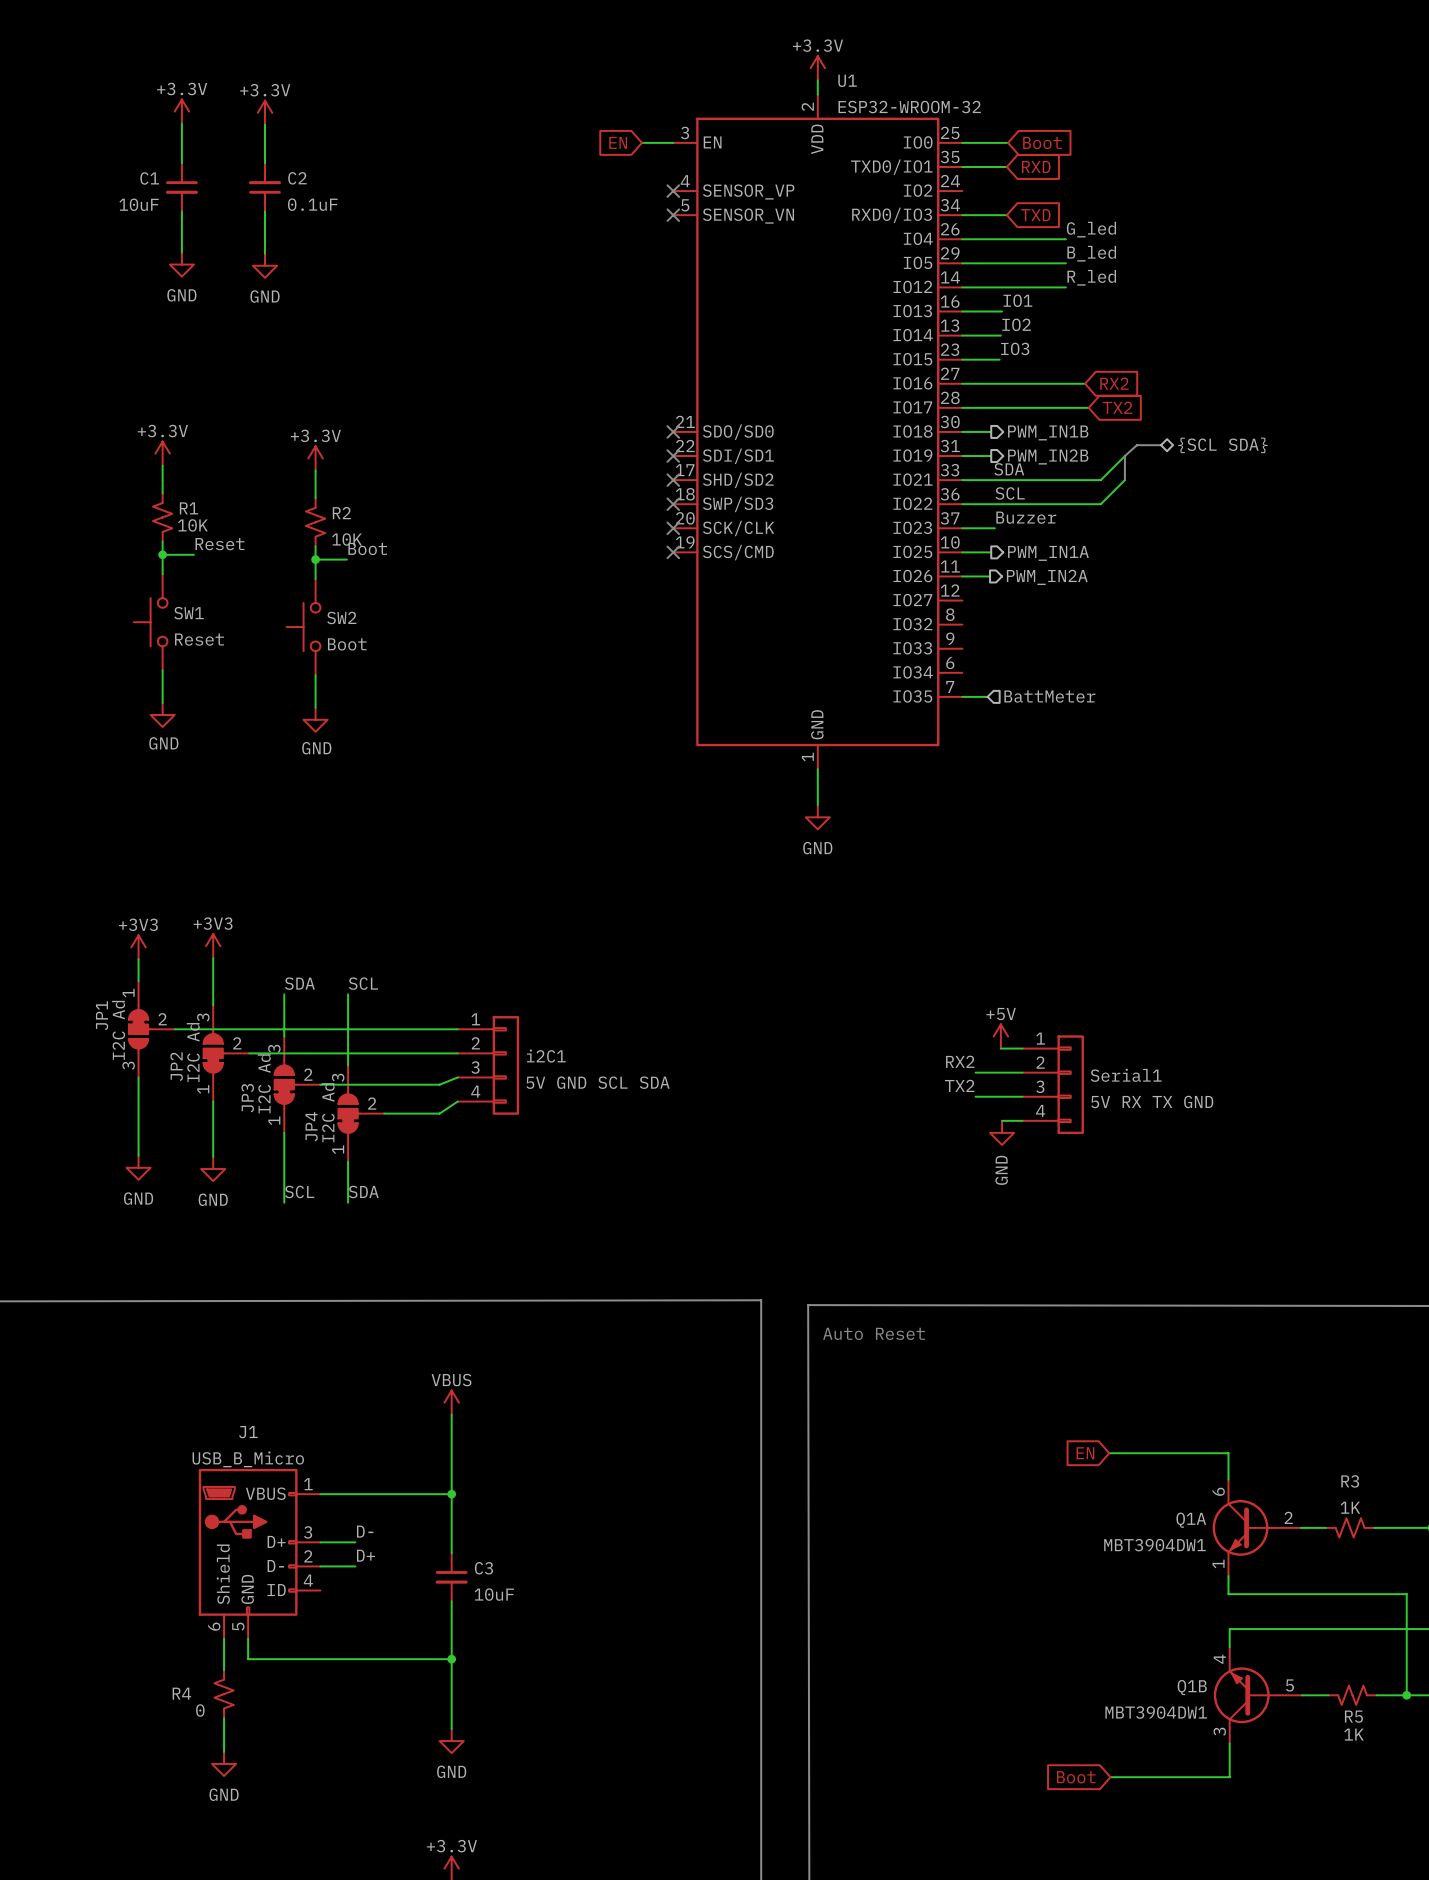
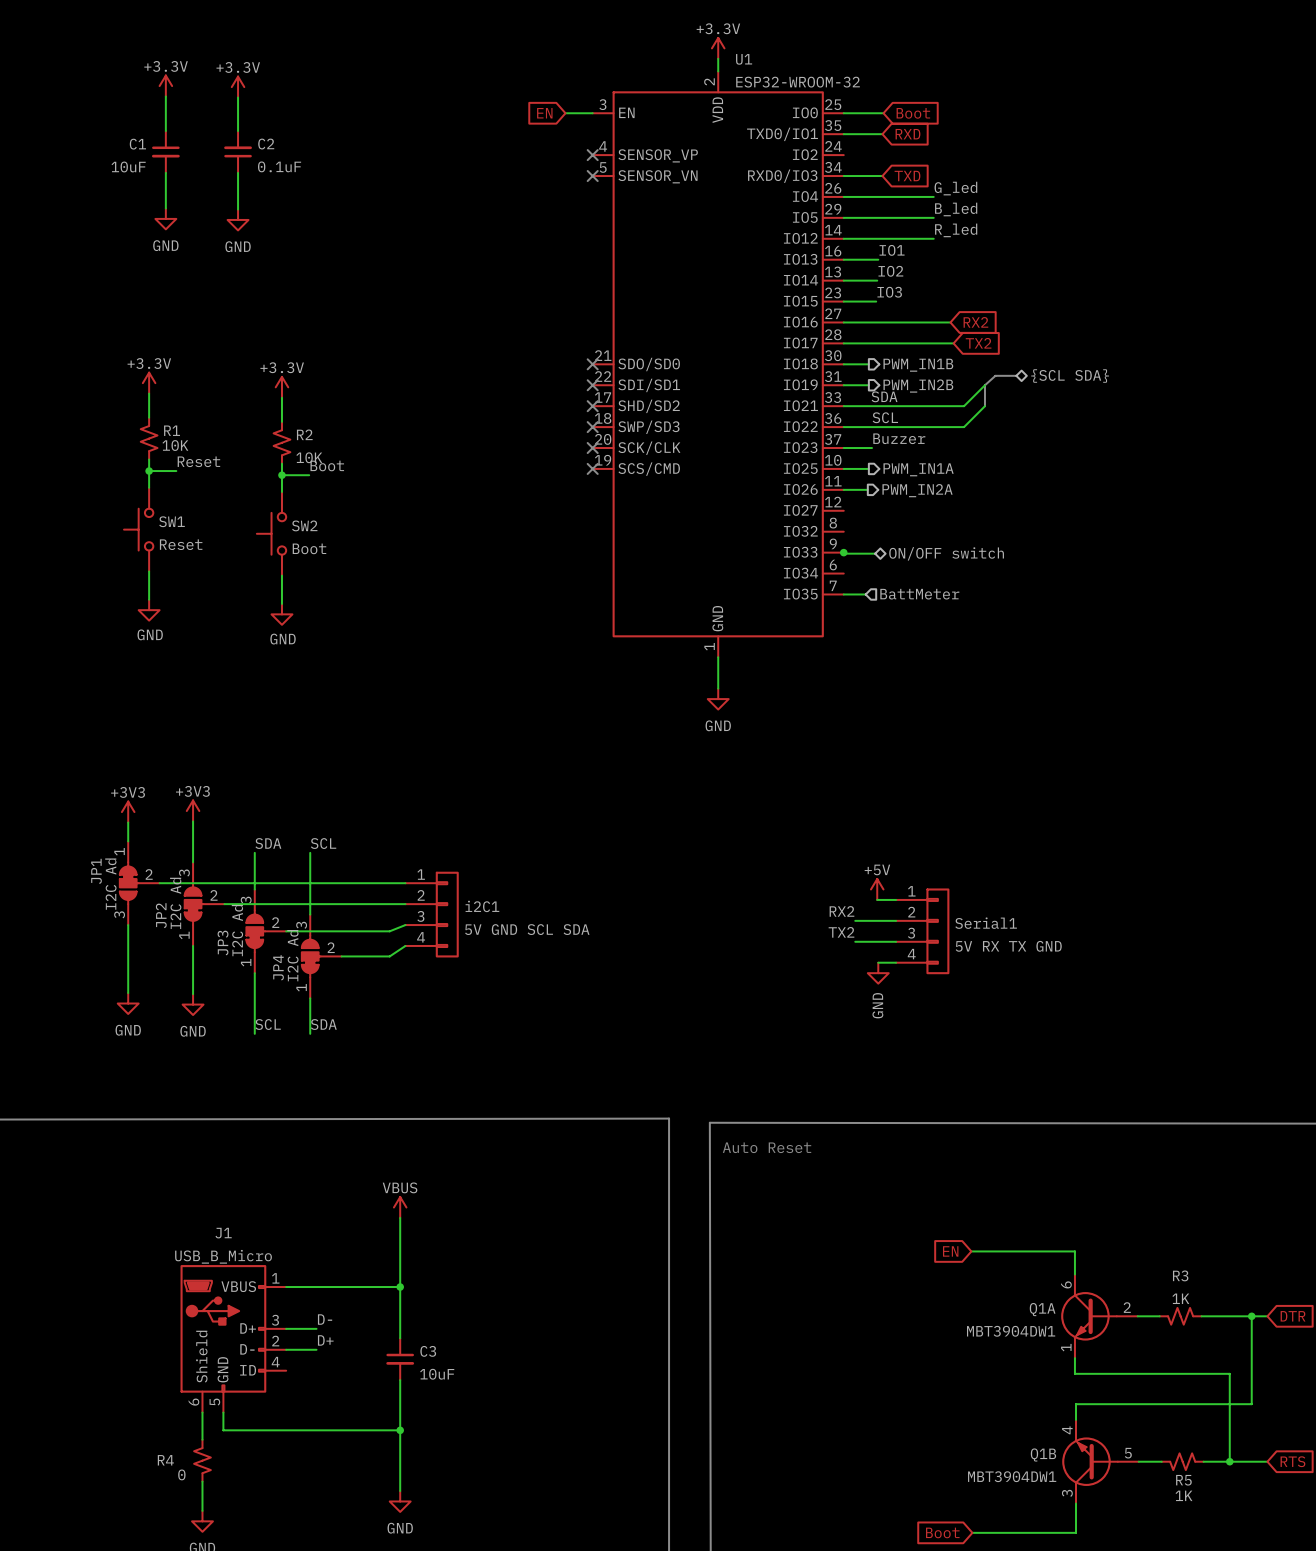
wire: none -> (843, 551) (843, 553) (875, 553)
junction: none -> (843, 552)
hierarchical label: none -> ON/OFF switch (946, 553)

